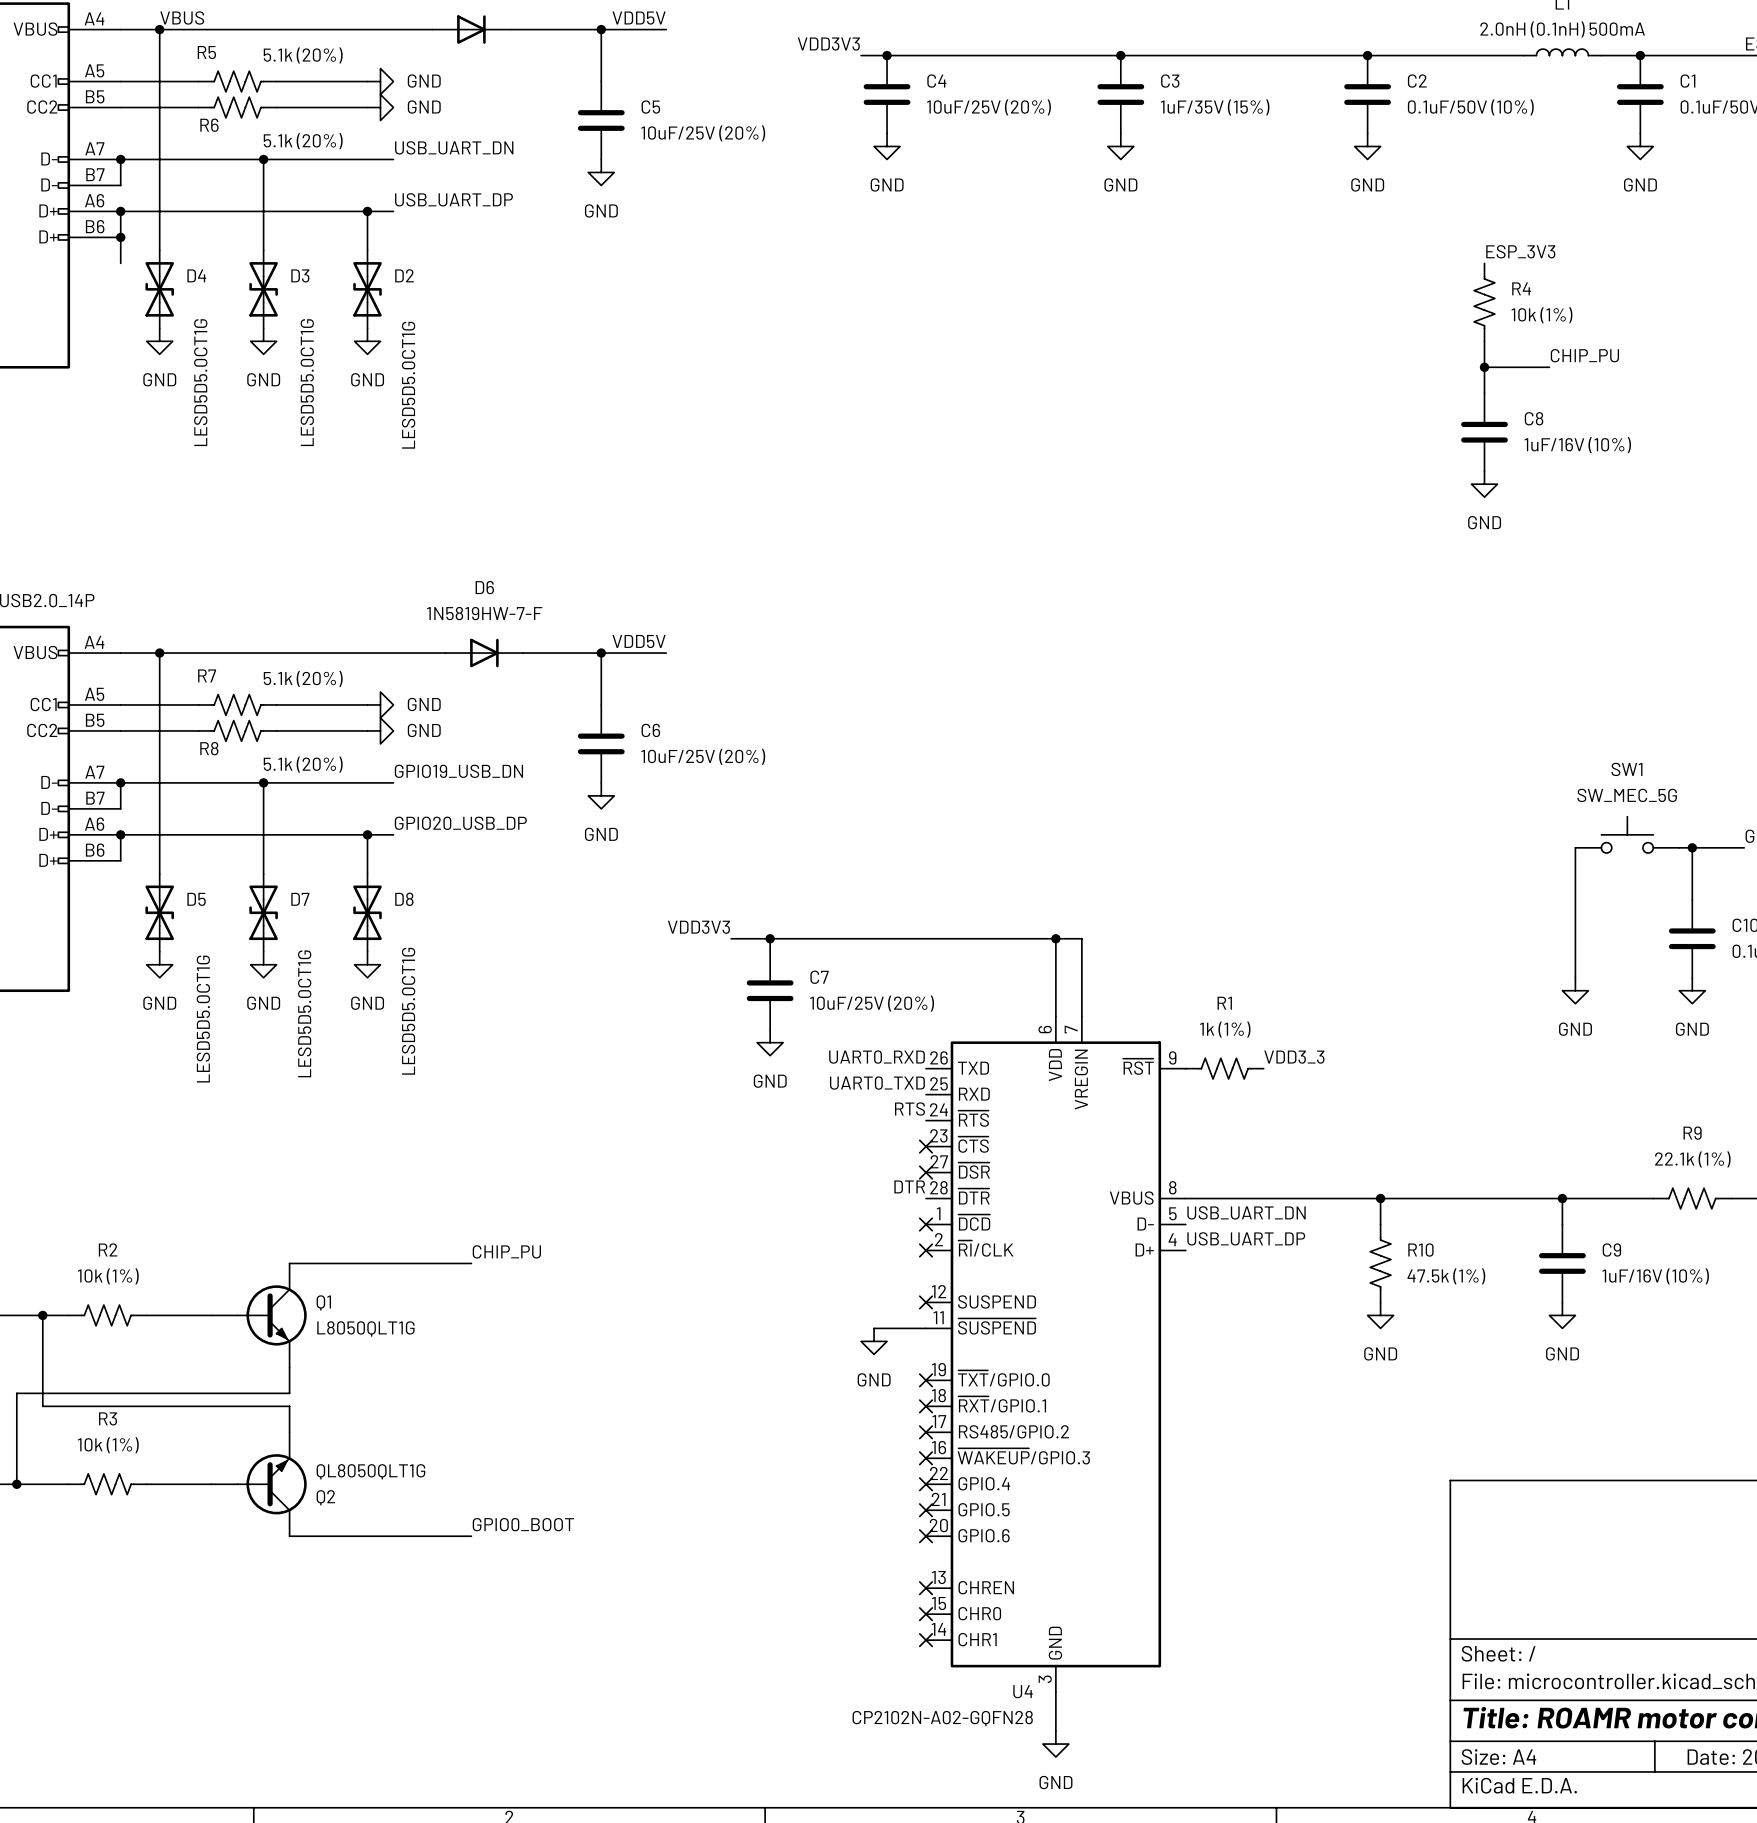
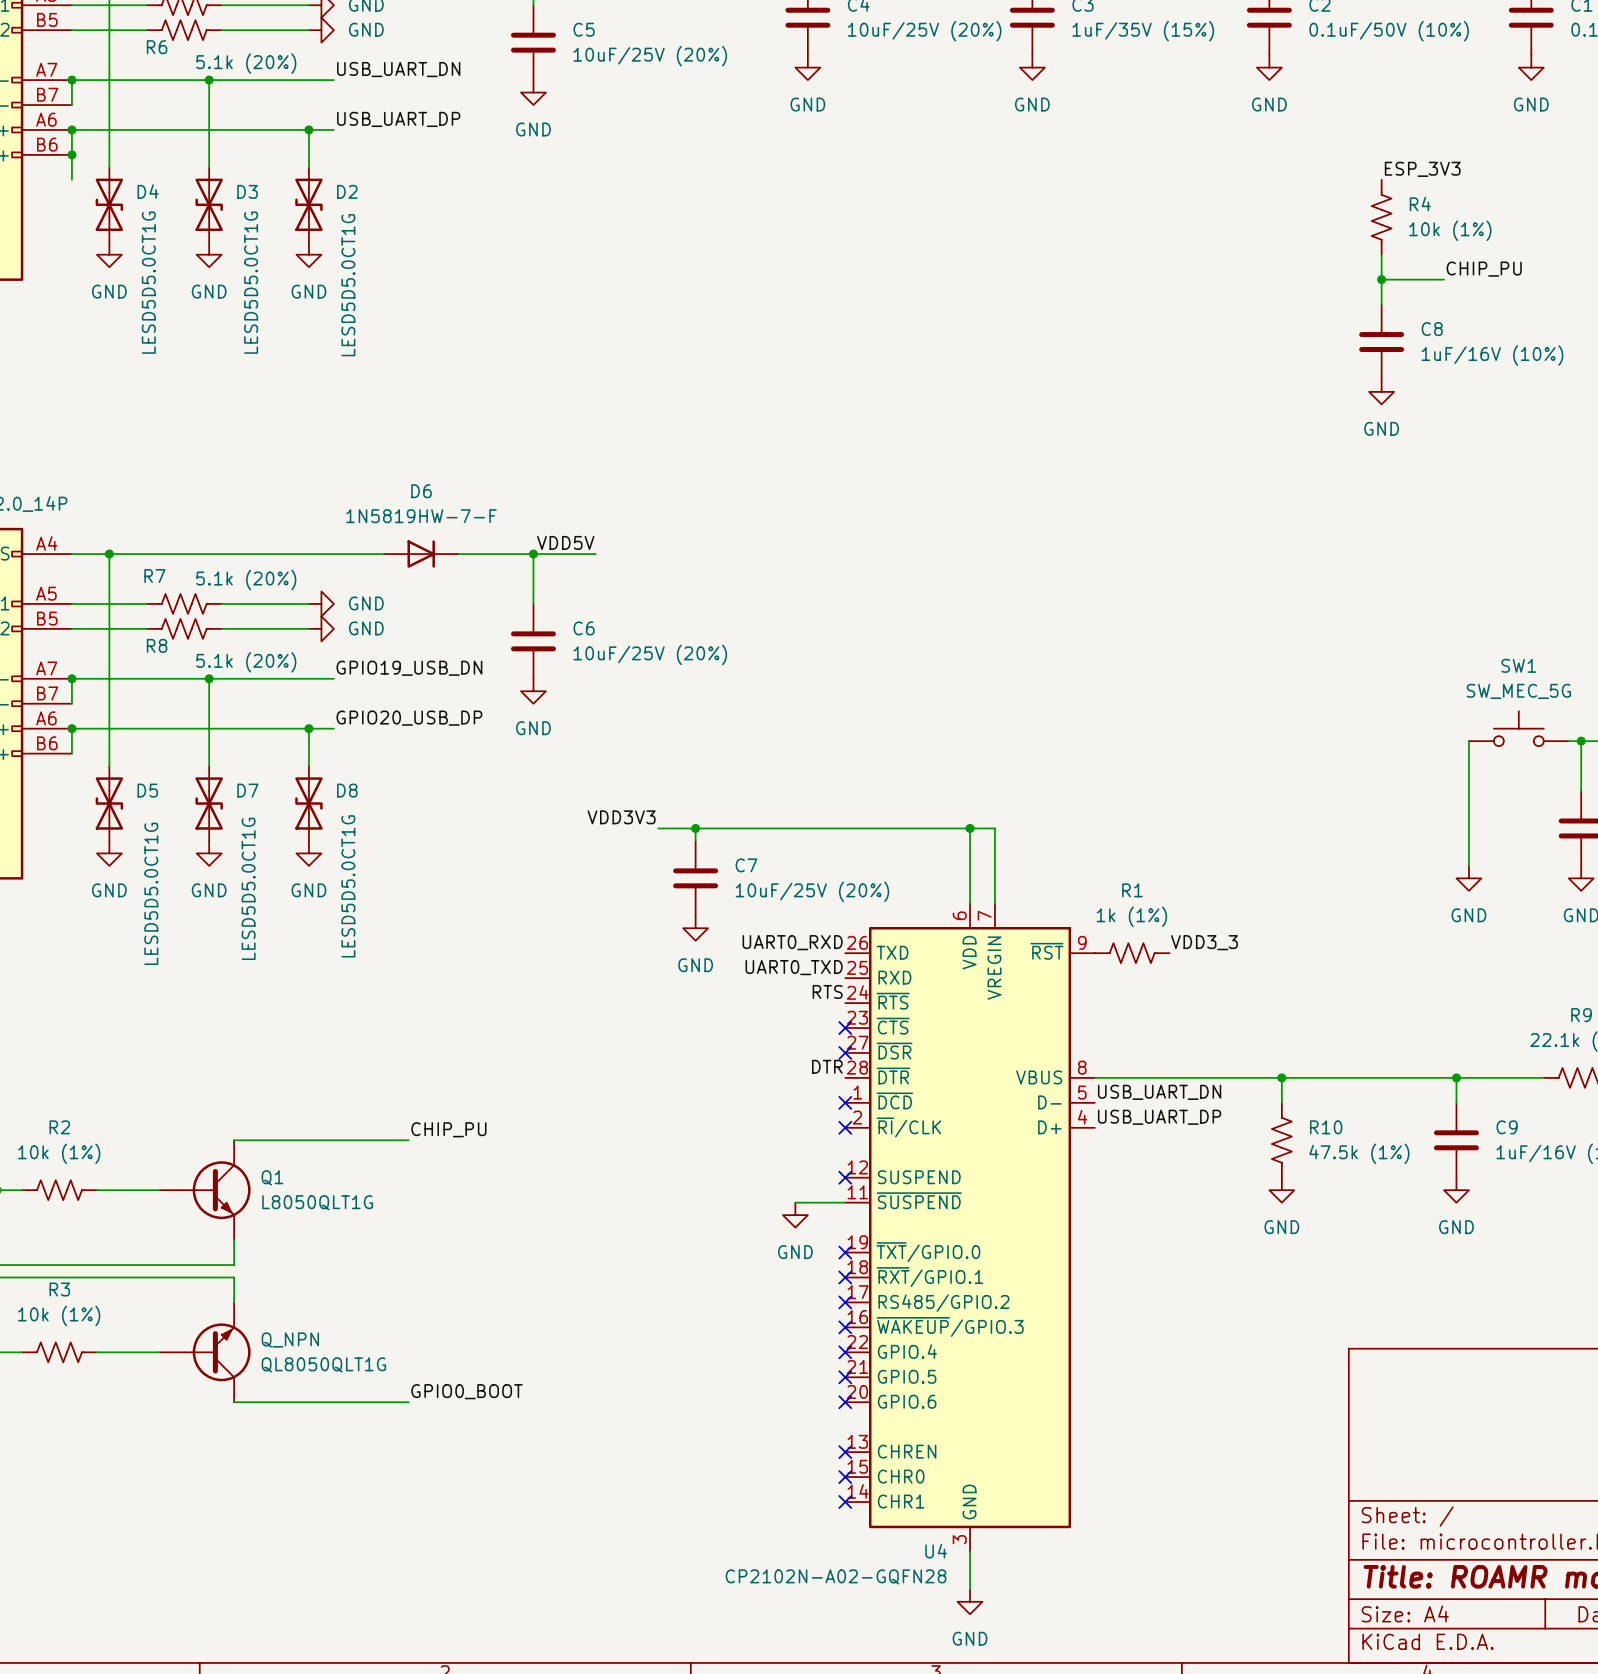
Q2 value: QL8050QLT1G (370, 1471) -> Q_NPN (290, 1339)
Q2 name: Q2 (325, 1497) -> QL8050QLT1G (323, 1364)

